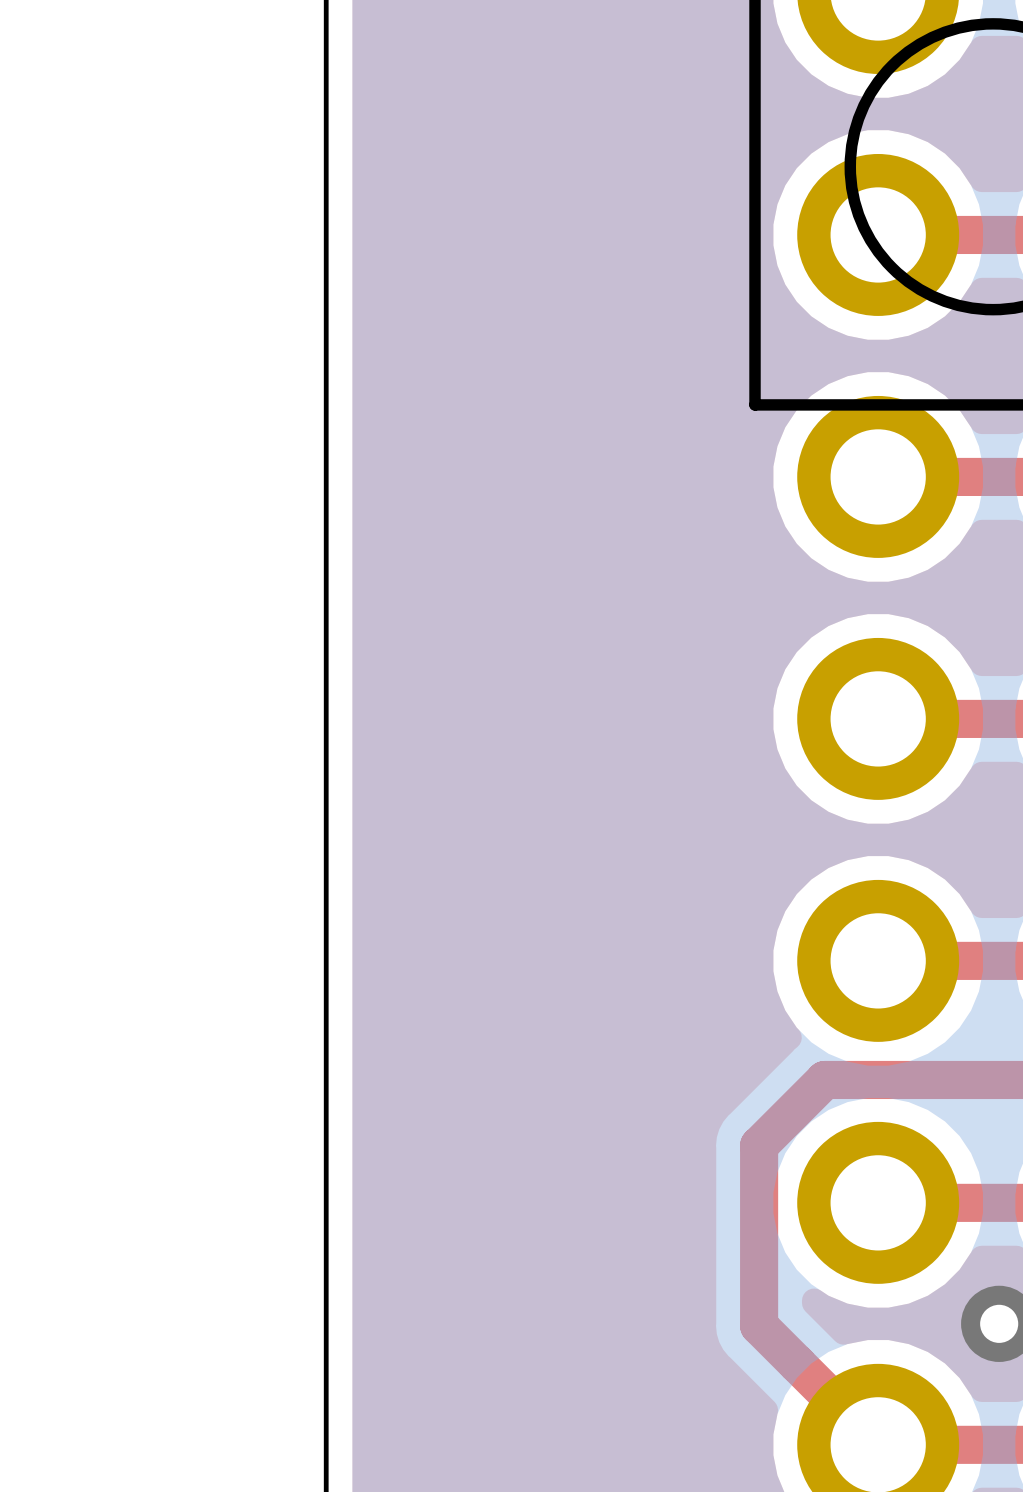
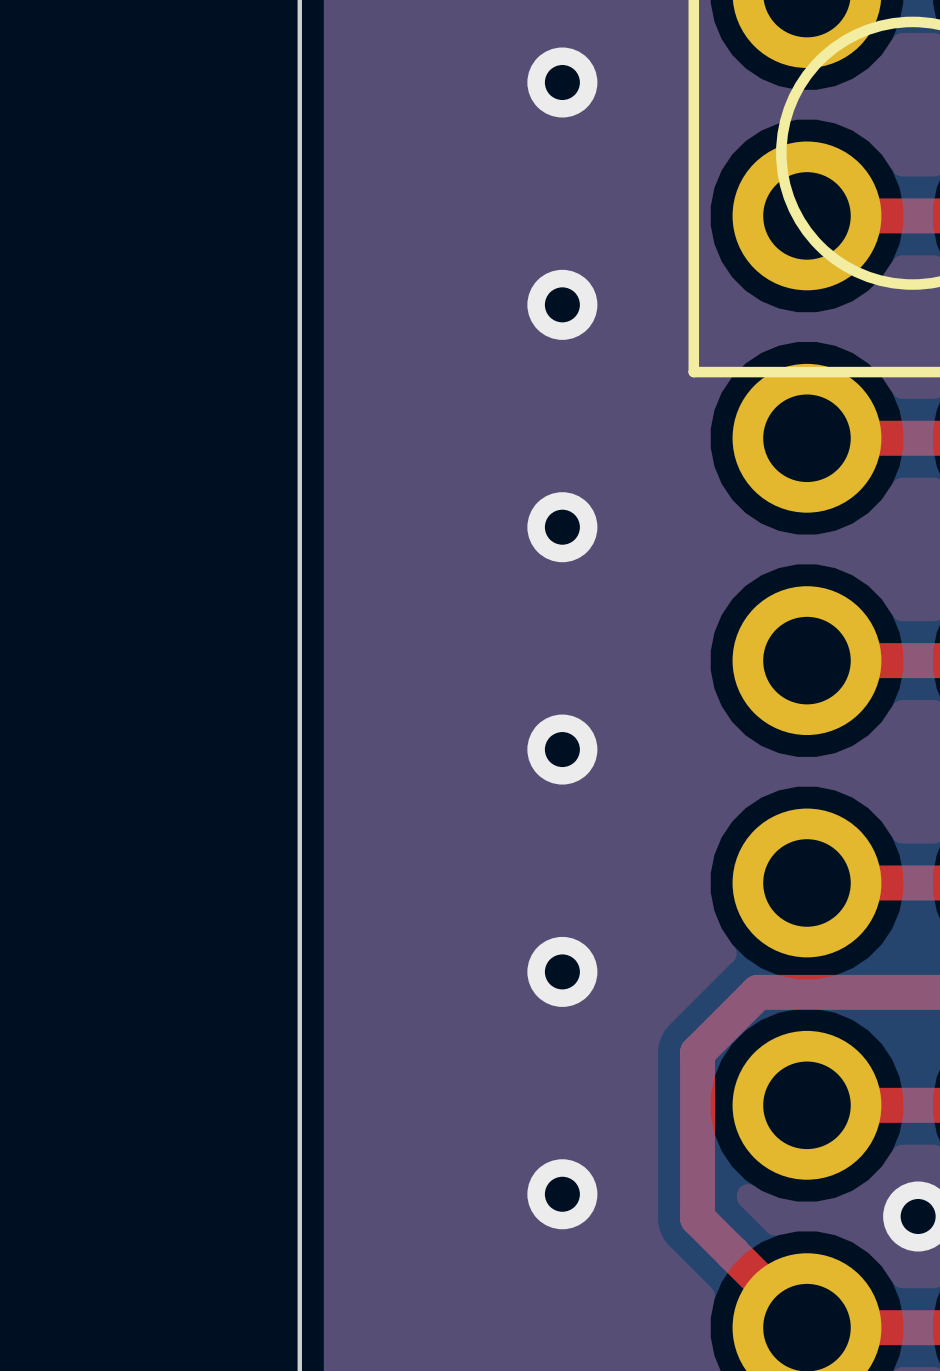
via: none -> (562, 82)
via: none -> (562, 304)
via: none -> (562, 527)
via: none -> (562, 749)
via: none -> (562, 971)
via: none -> (562, 1194)

